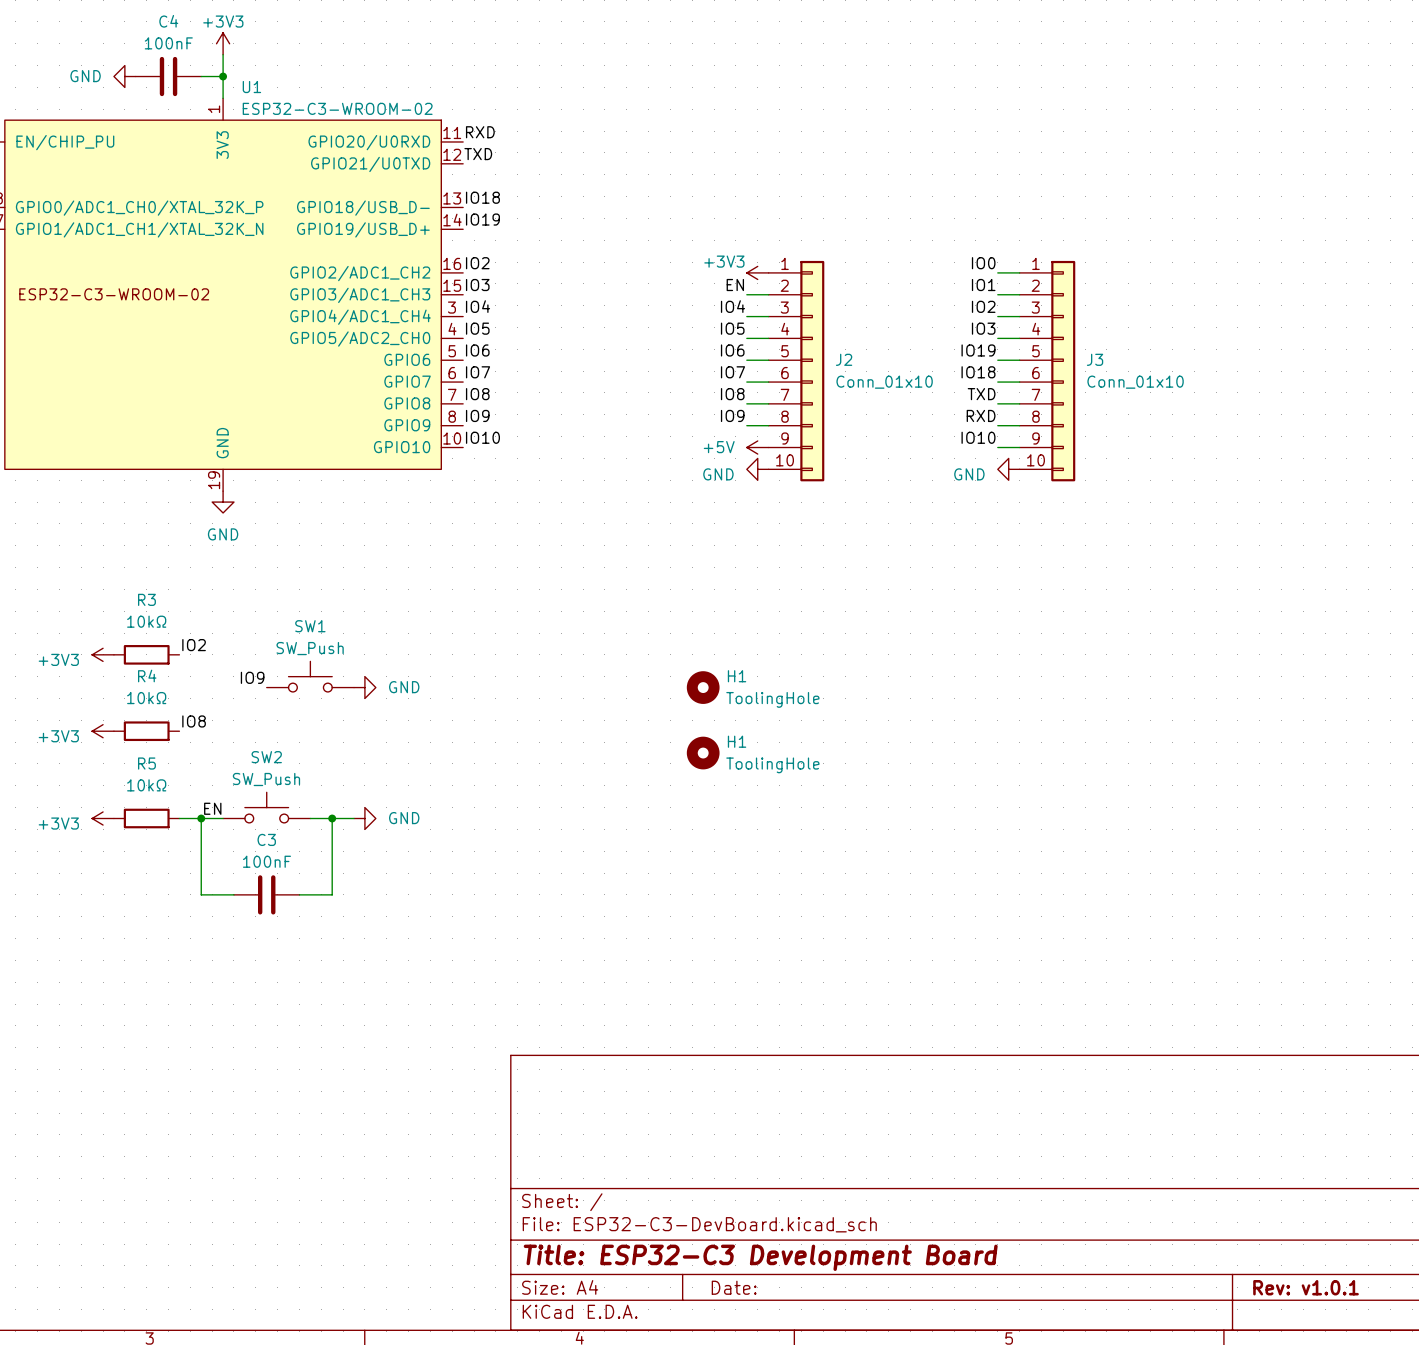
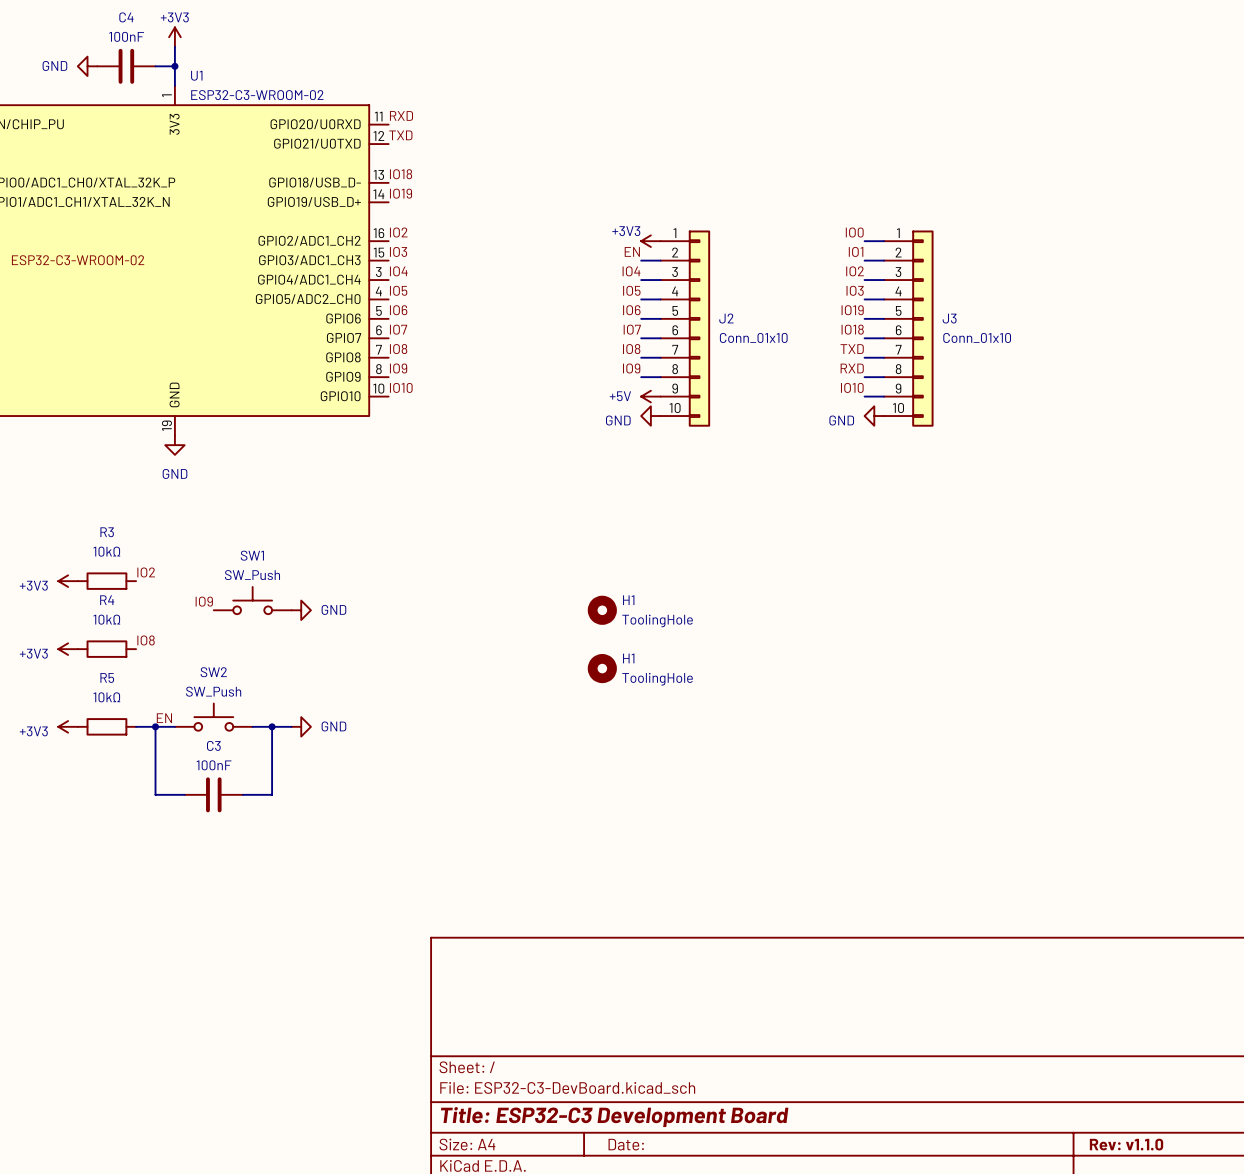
title block: Rev: v1.0.1 (1306, 1287) -> Rev: v1.1.0 (1126, 1144)

